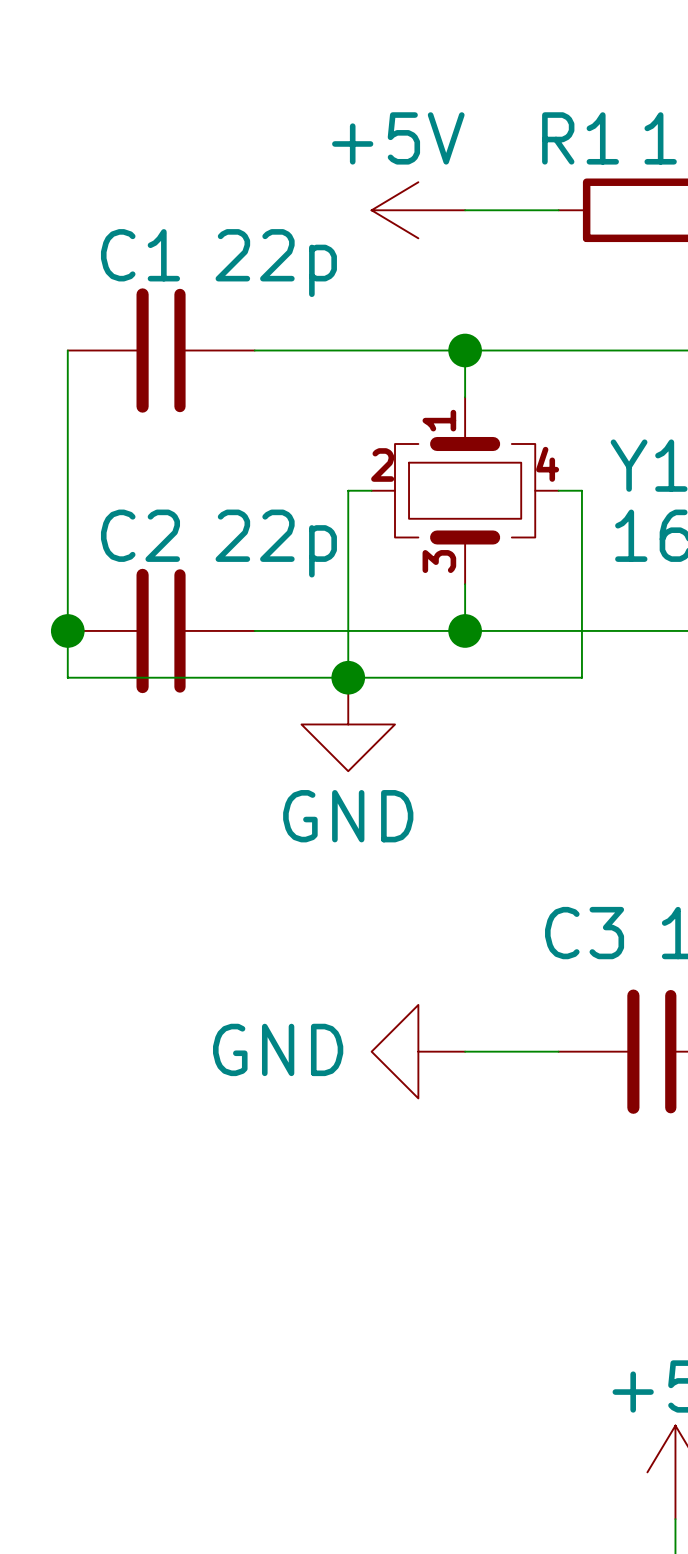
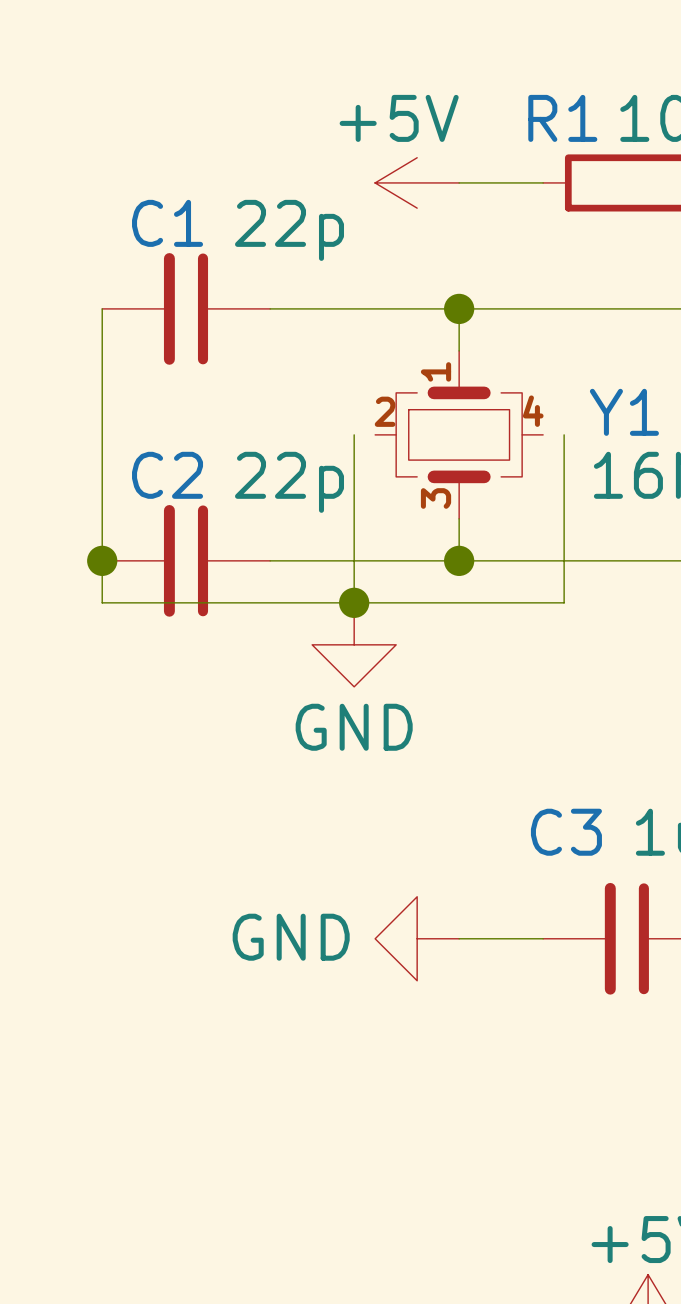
wire: (348, 490) (371, 490) -> none
wire: (558, 490) (581, 490) -> none

